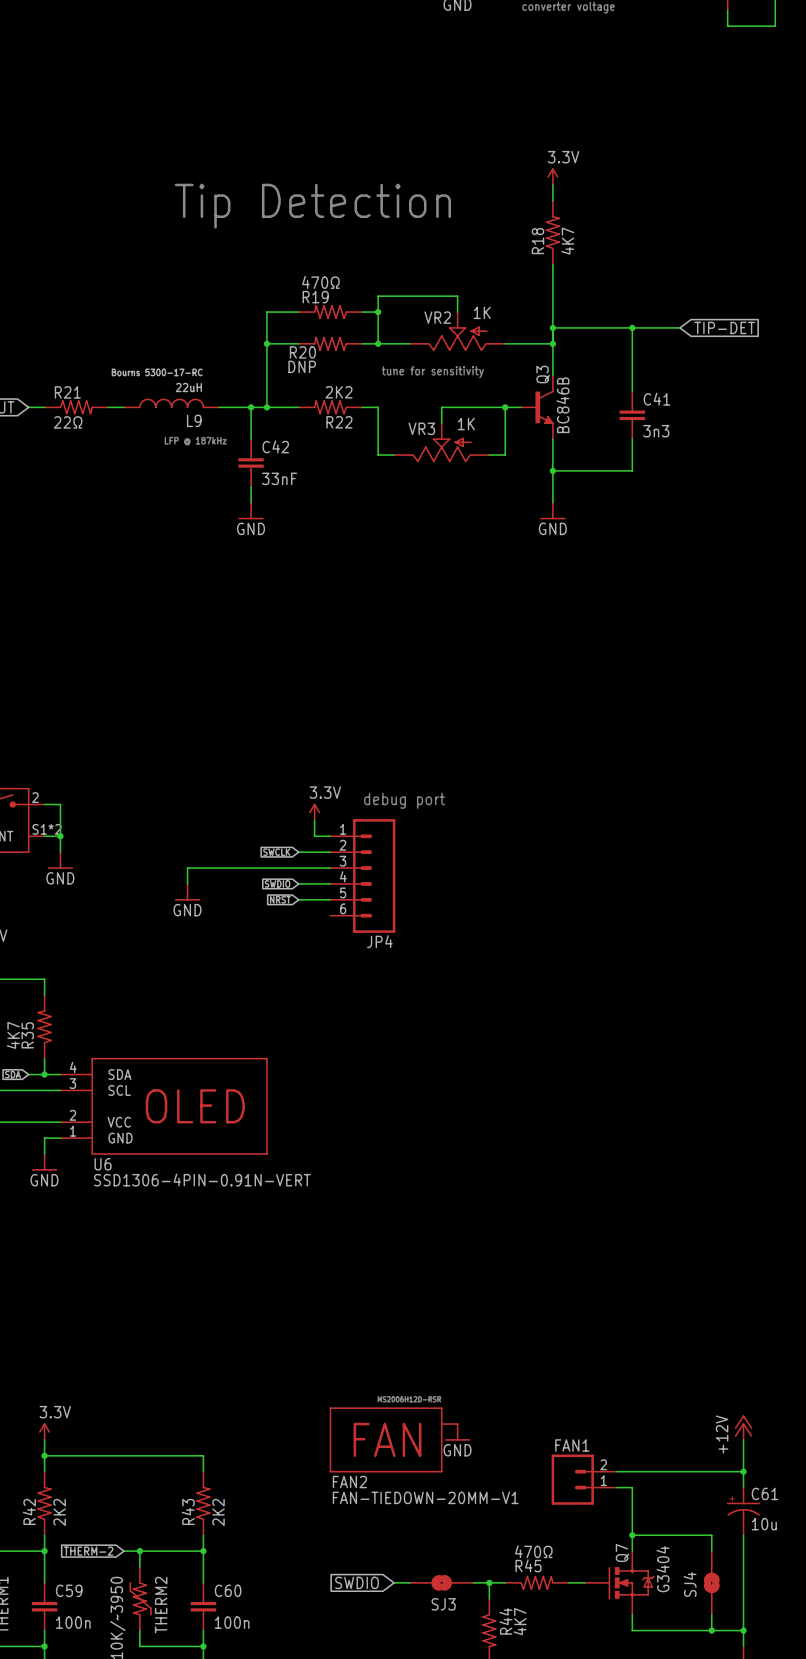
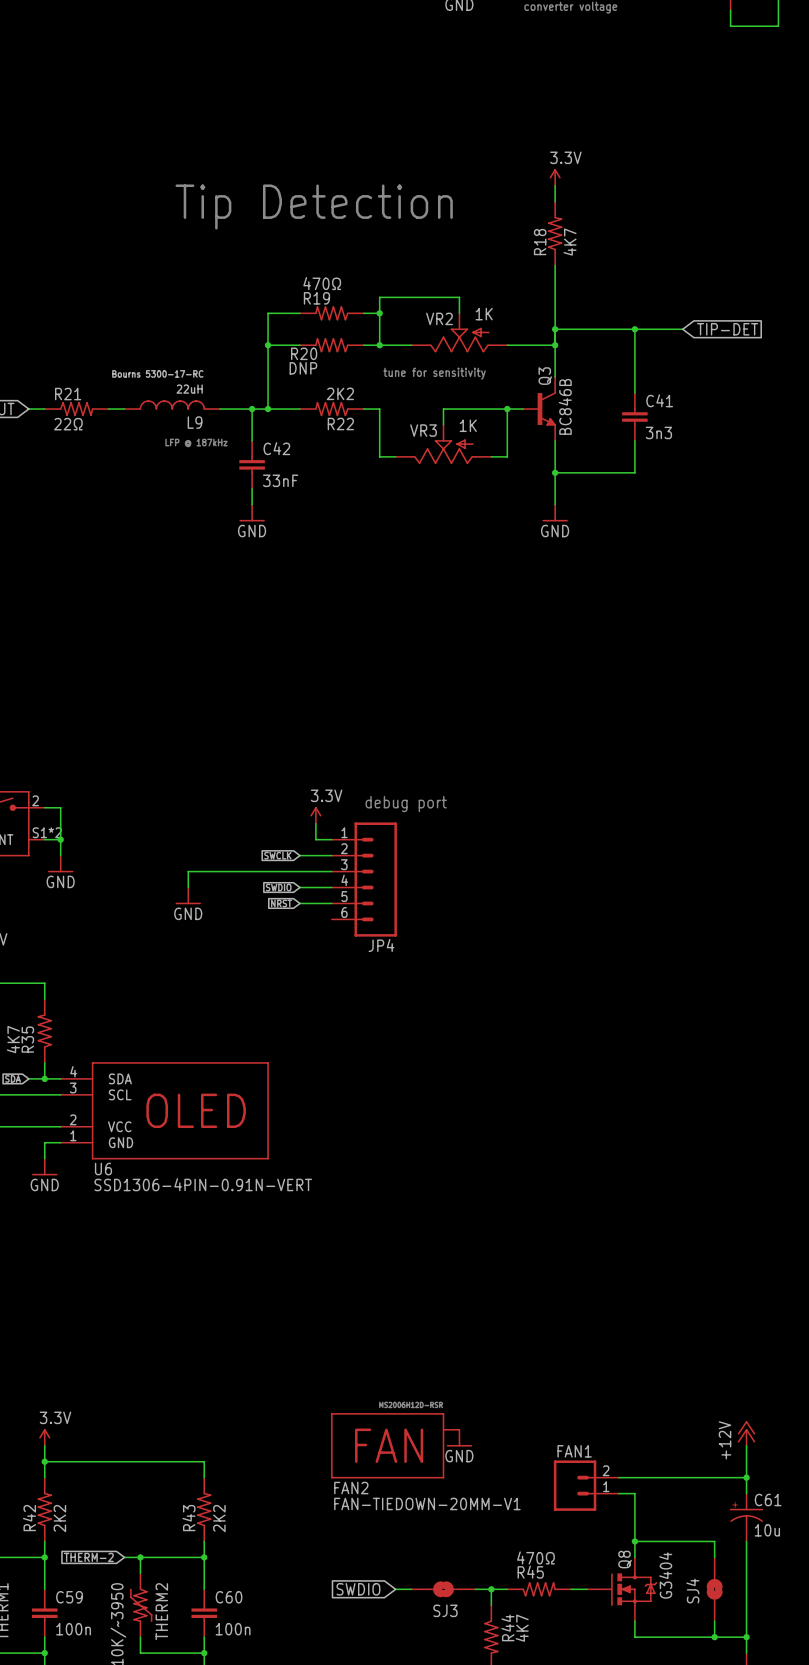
Q7 name: Q7 (622, 1553) -> Q8 (625, 1559)

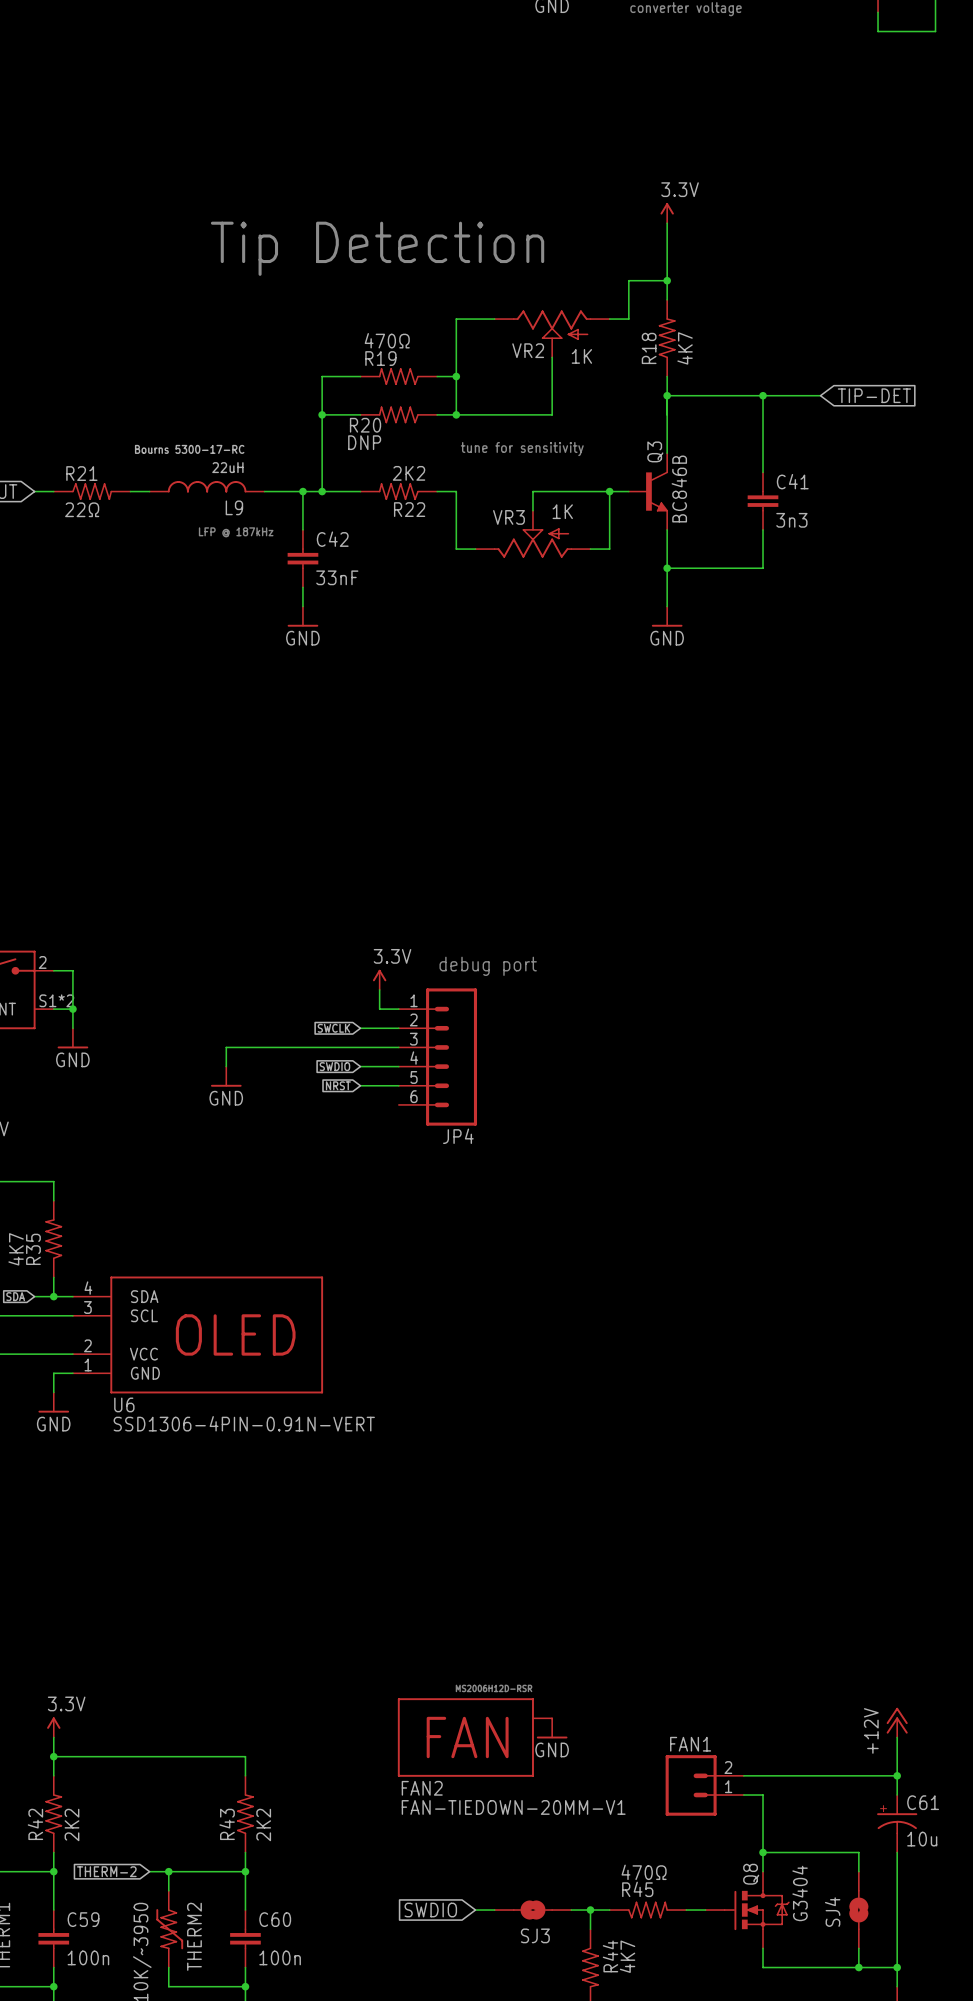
wire: none -> (667, 280) (628, 280) (628, 319) (609, 319)
R18 position: (555, 233) -> (667, 338)
junction: none -> (667, 280)
wire: (379, 297) (459, 297) -> (456, 357) (456, 319) (494, 319)
VR2 flip: as is (459, 340) -> up-down (552, 325)
wire: (507, 345) (555, 345) -> none
junction: (555, 345) -> none

